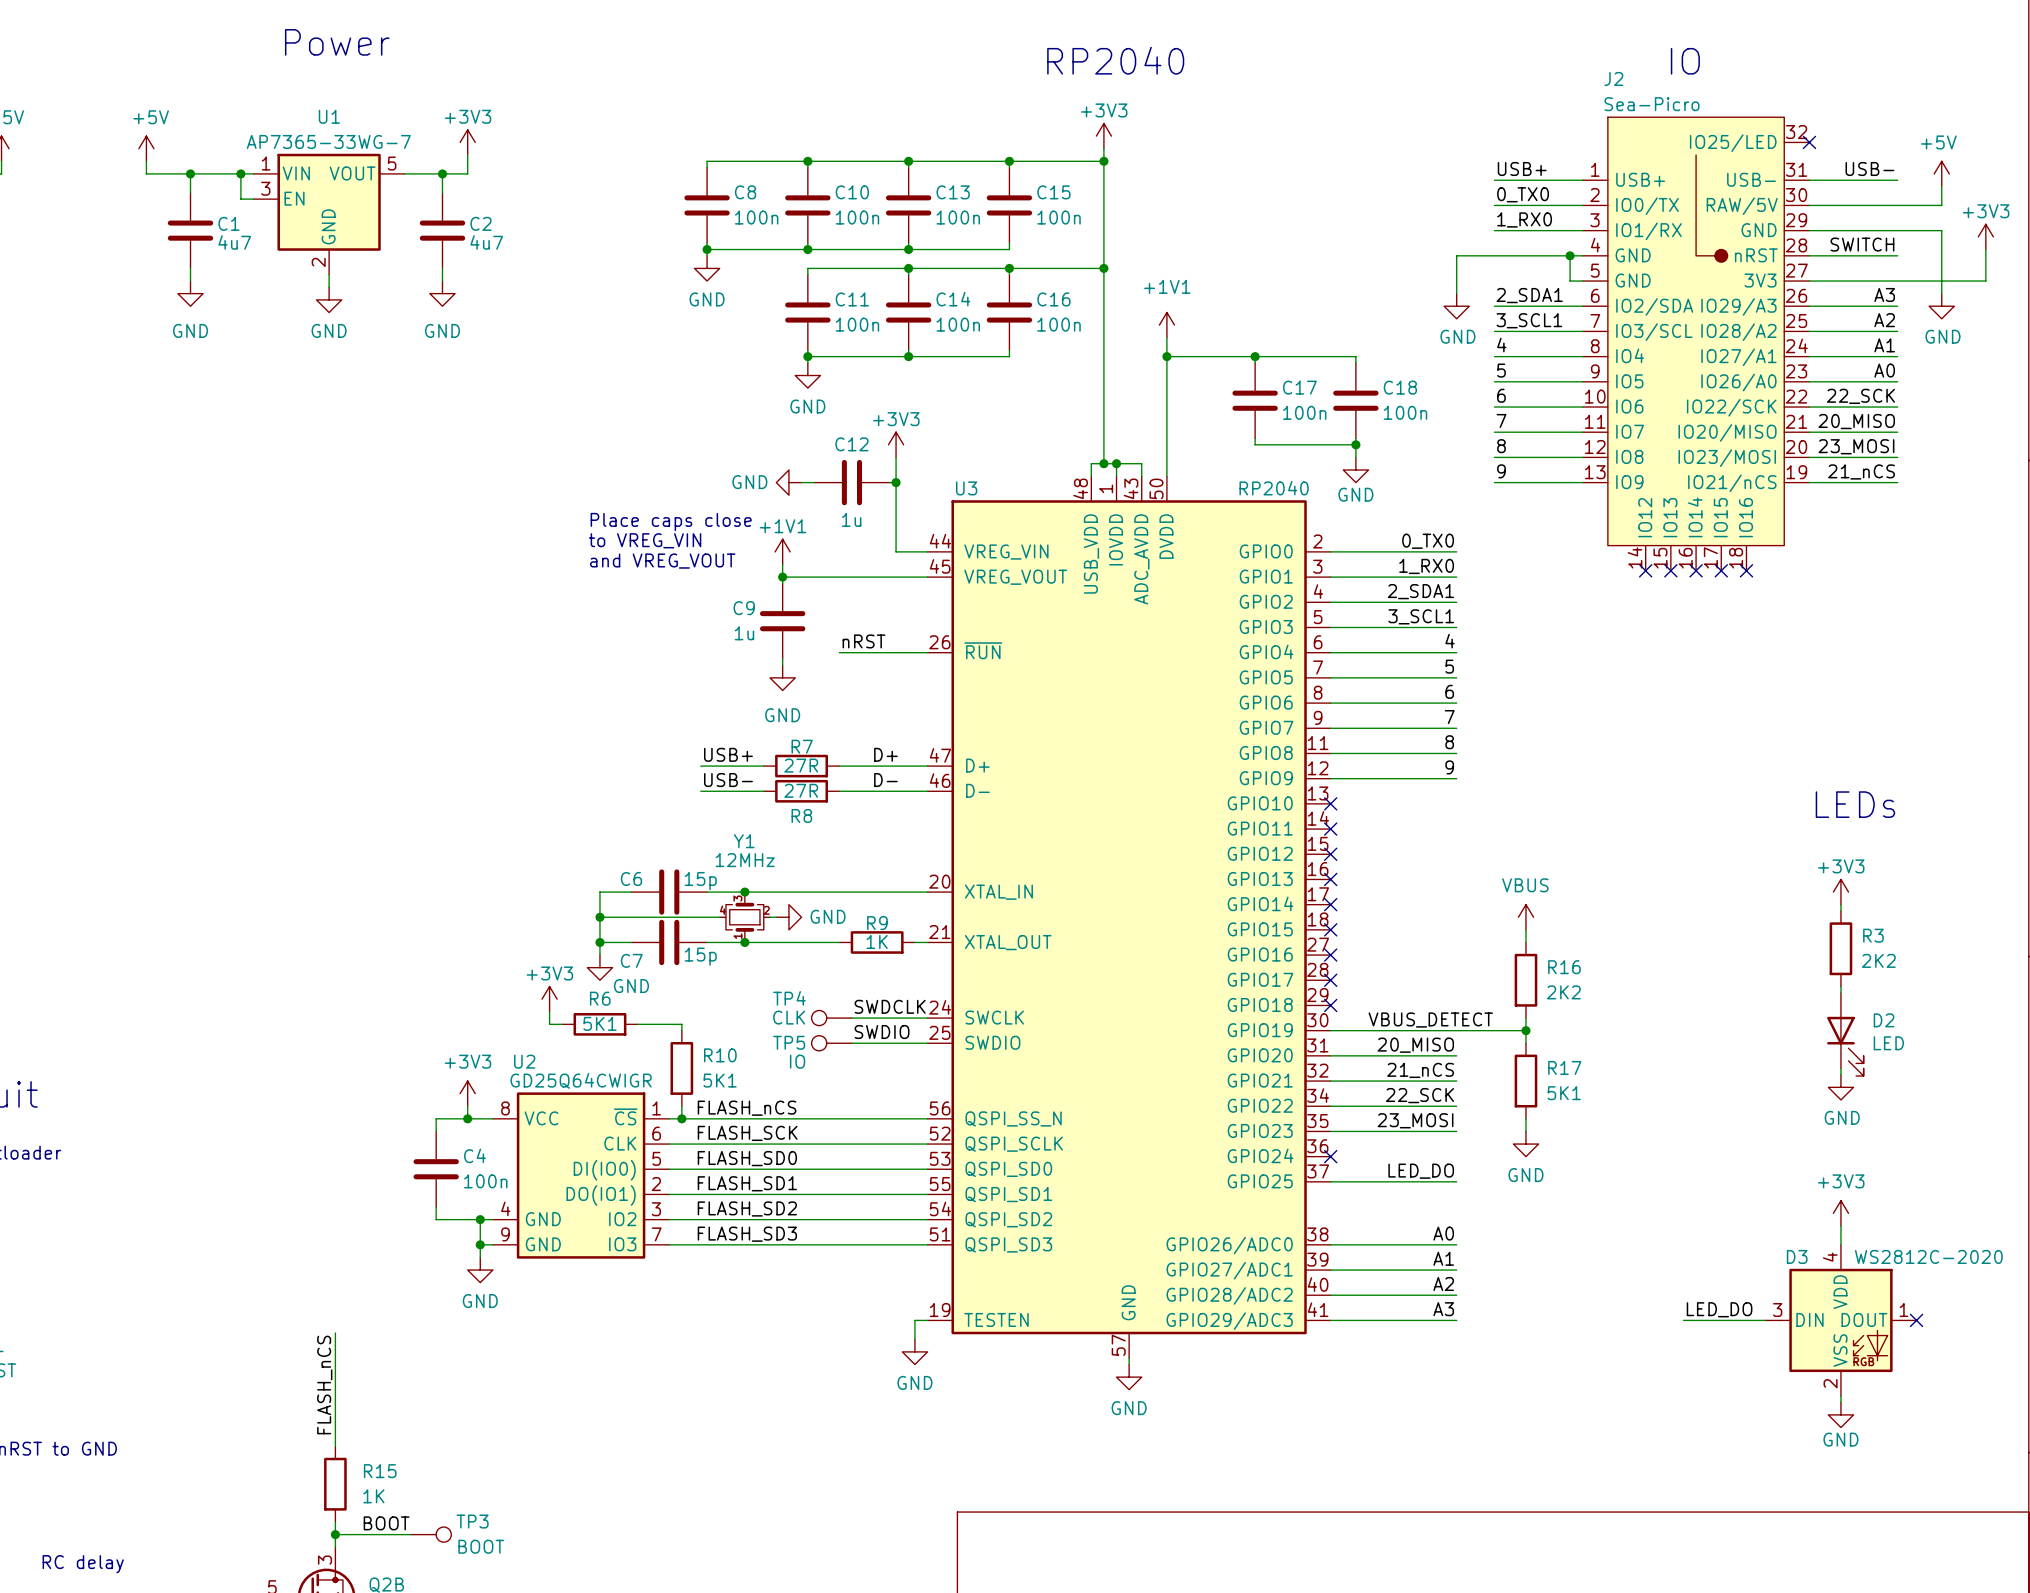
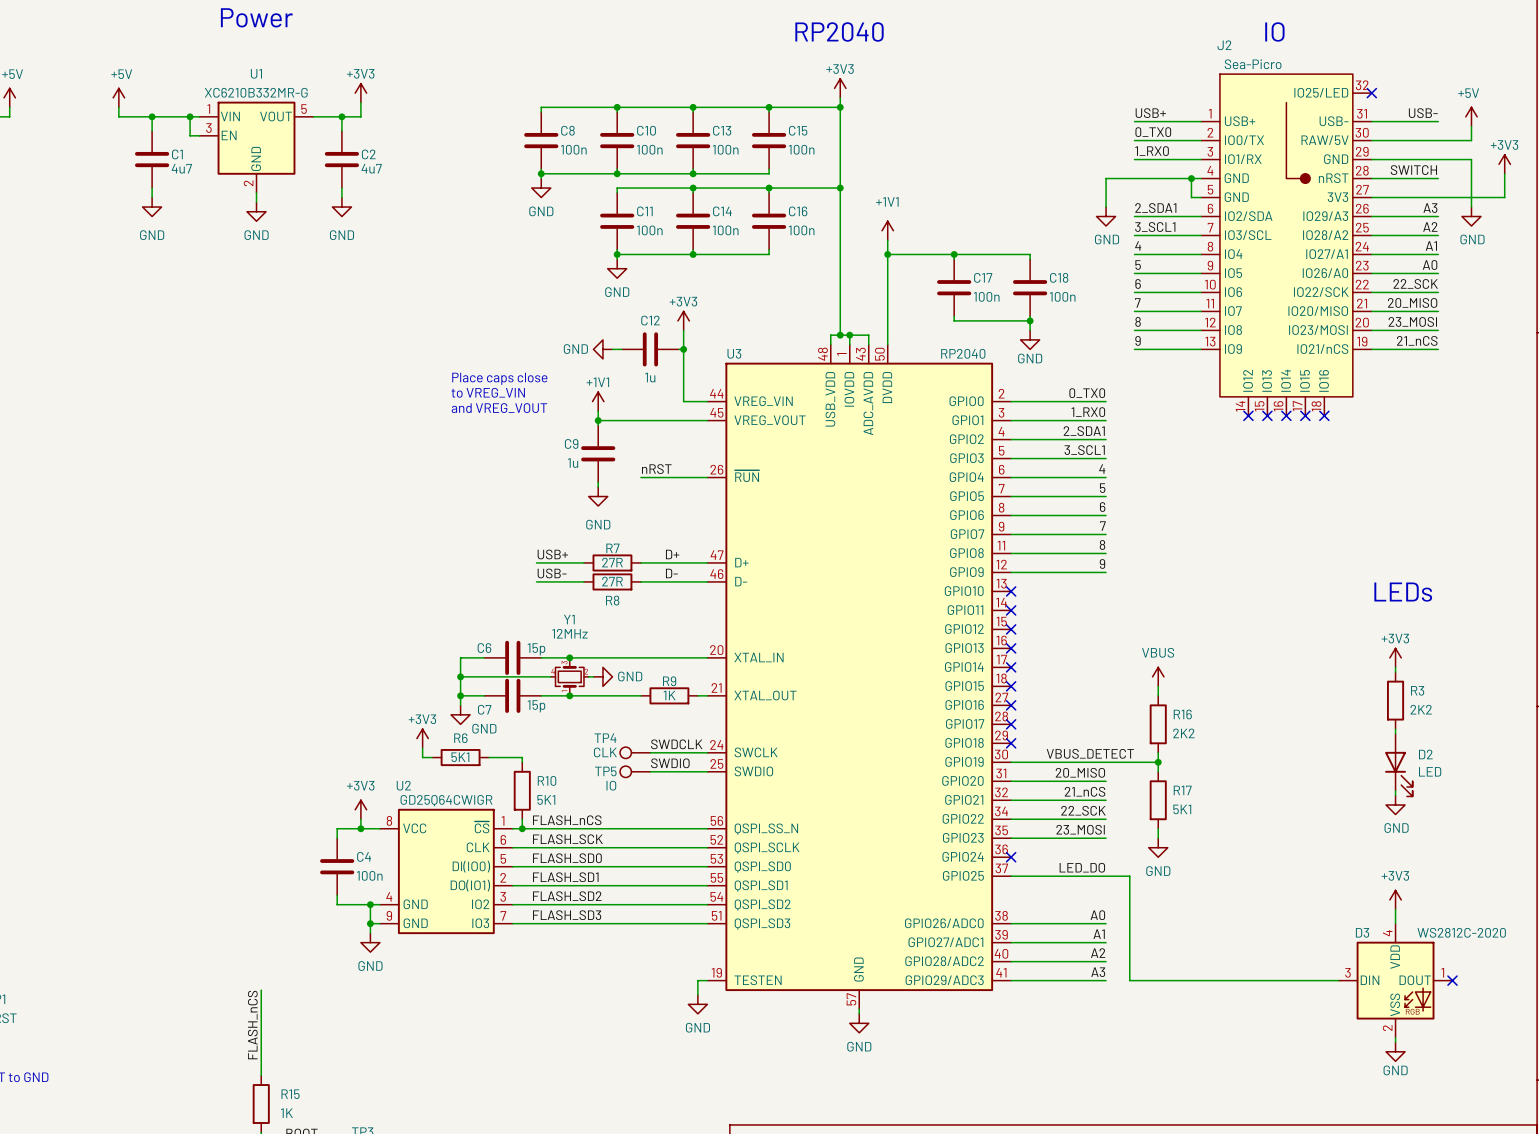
U1 value: AP7365-33WG-7 (328, 141) -> XC6210B332MR-G (256, 92)
wire: none -> (1106, 876) (1129, 876) (1129, 980) (1276, 980)
label: LED_DO (1719, 1309) -> none

